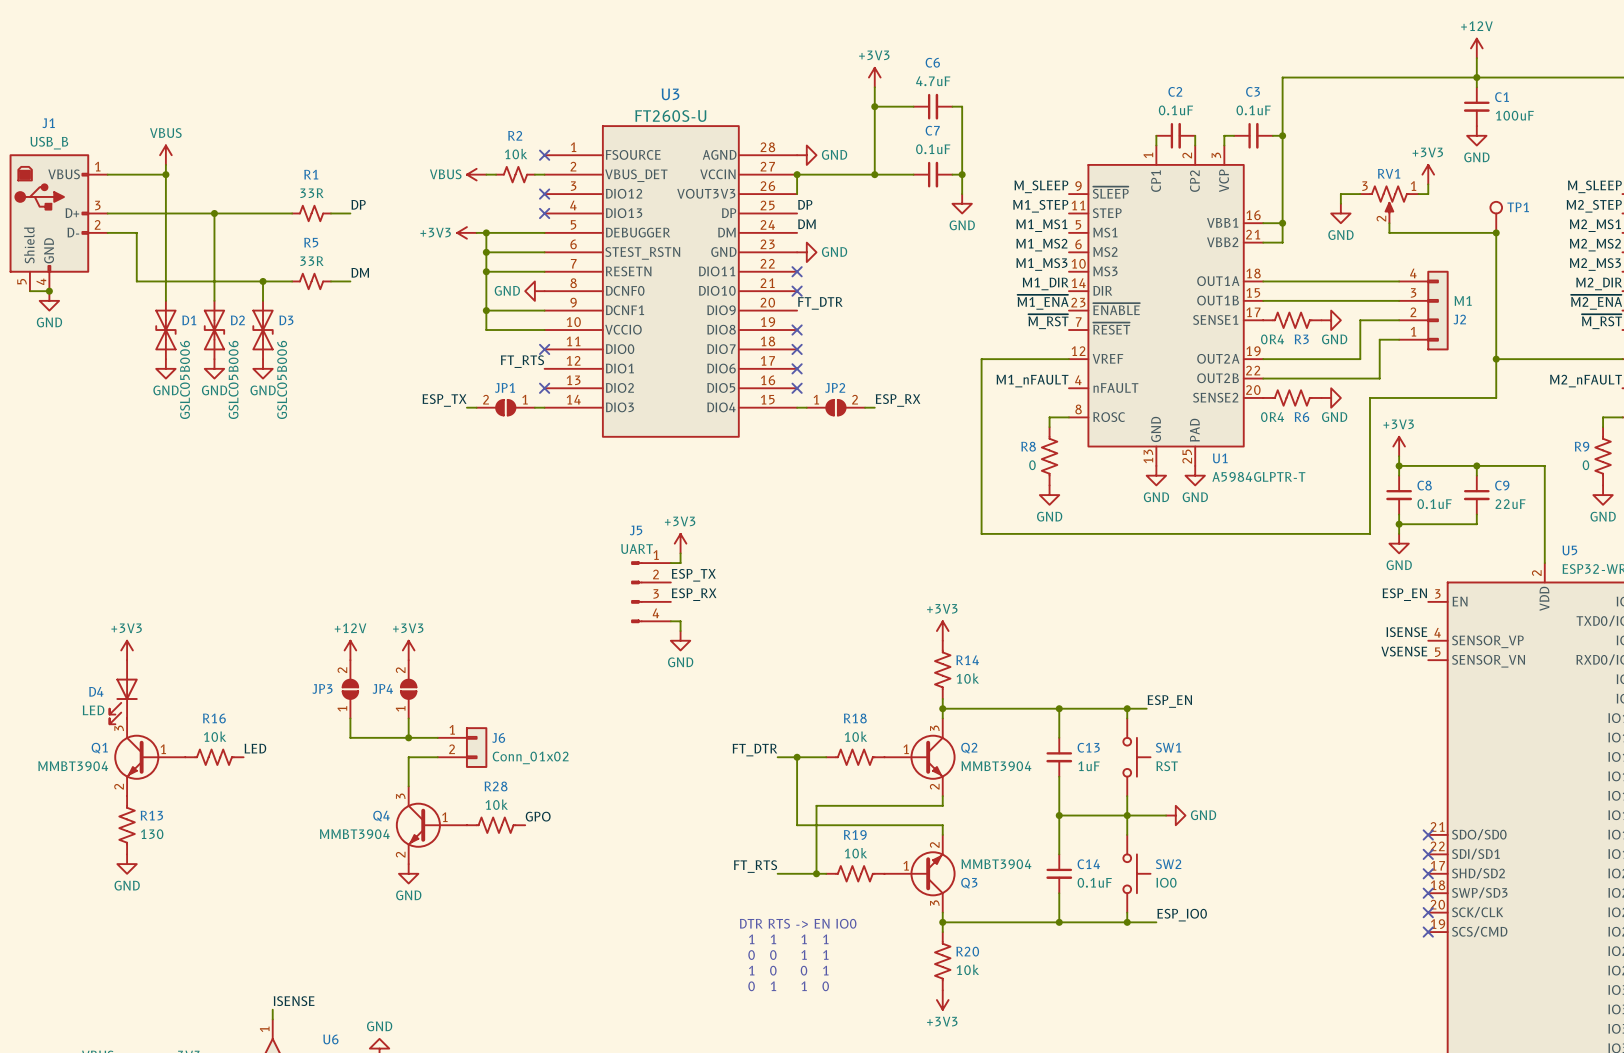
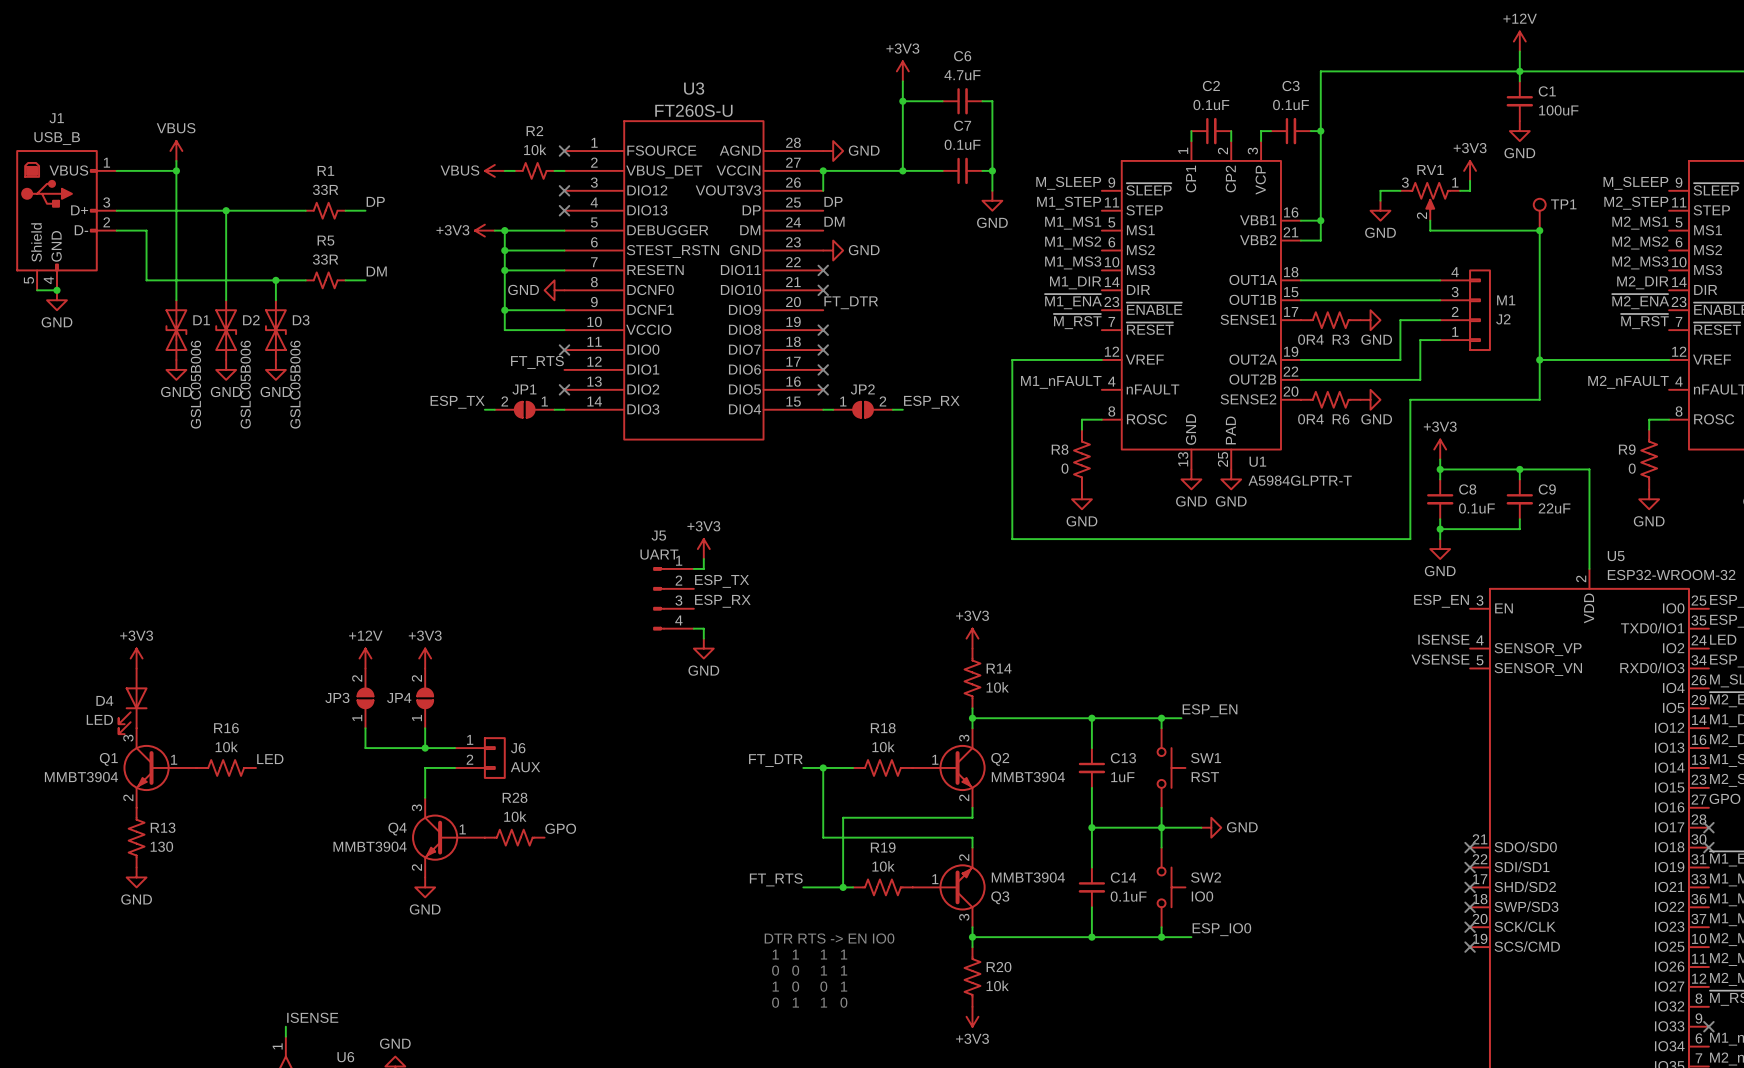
J6 value: Conn_01x02 (530, 757) -> AUX (525, 767)

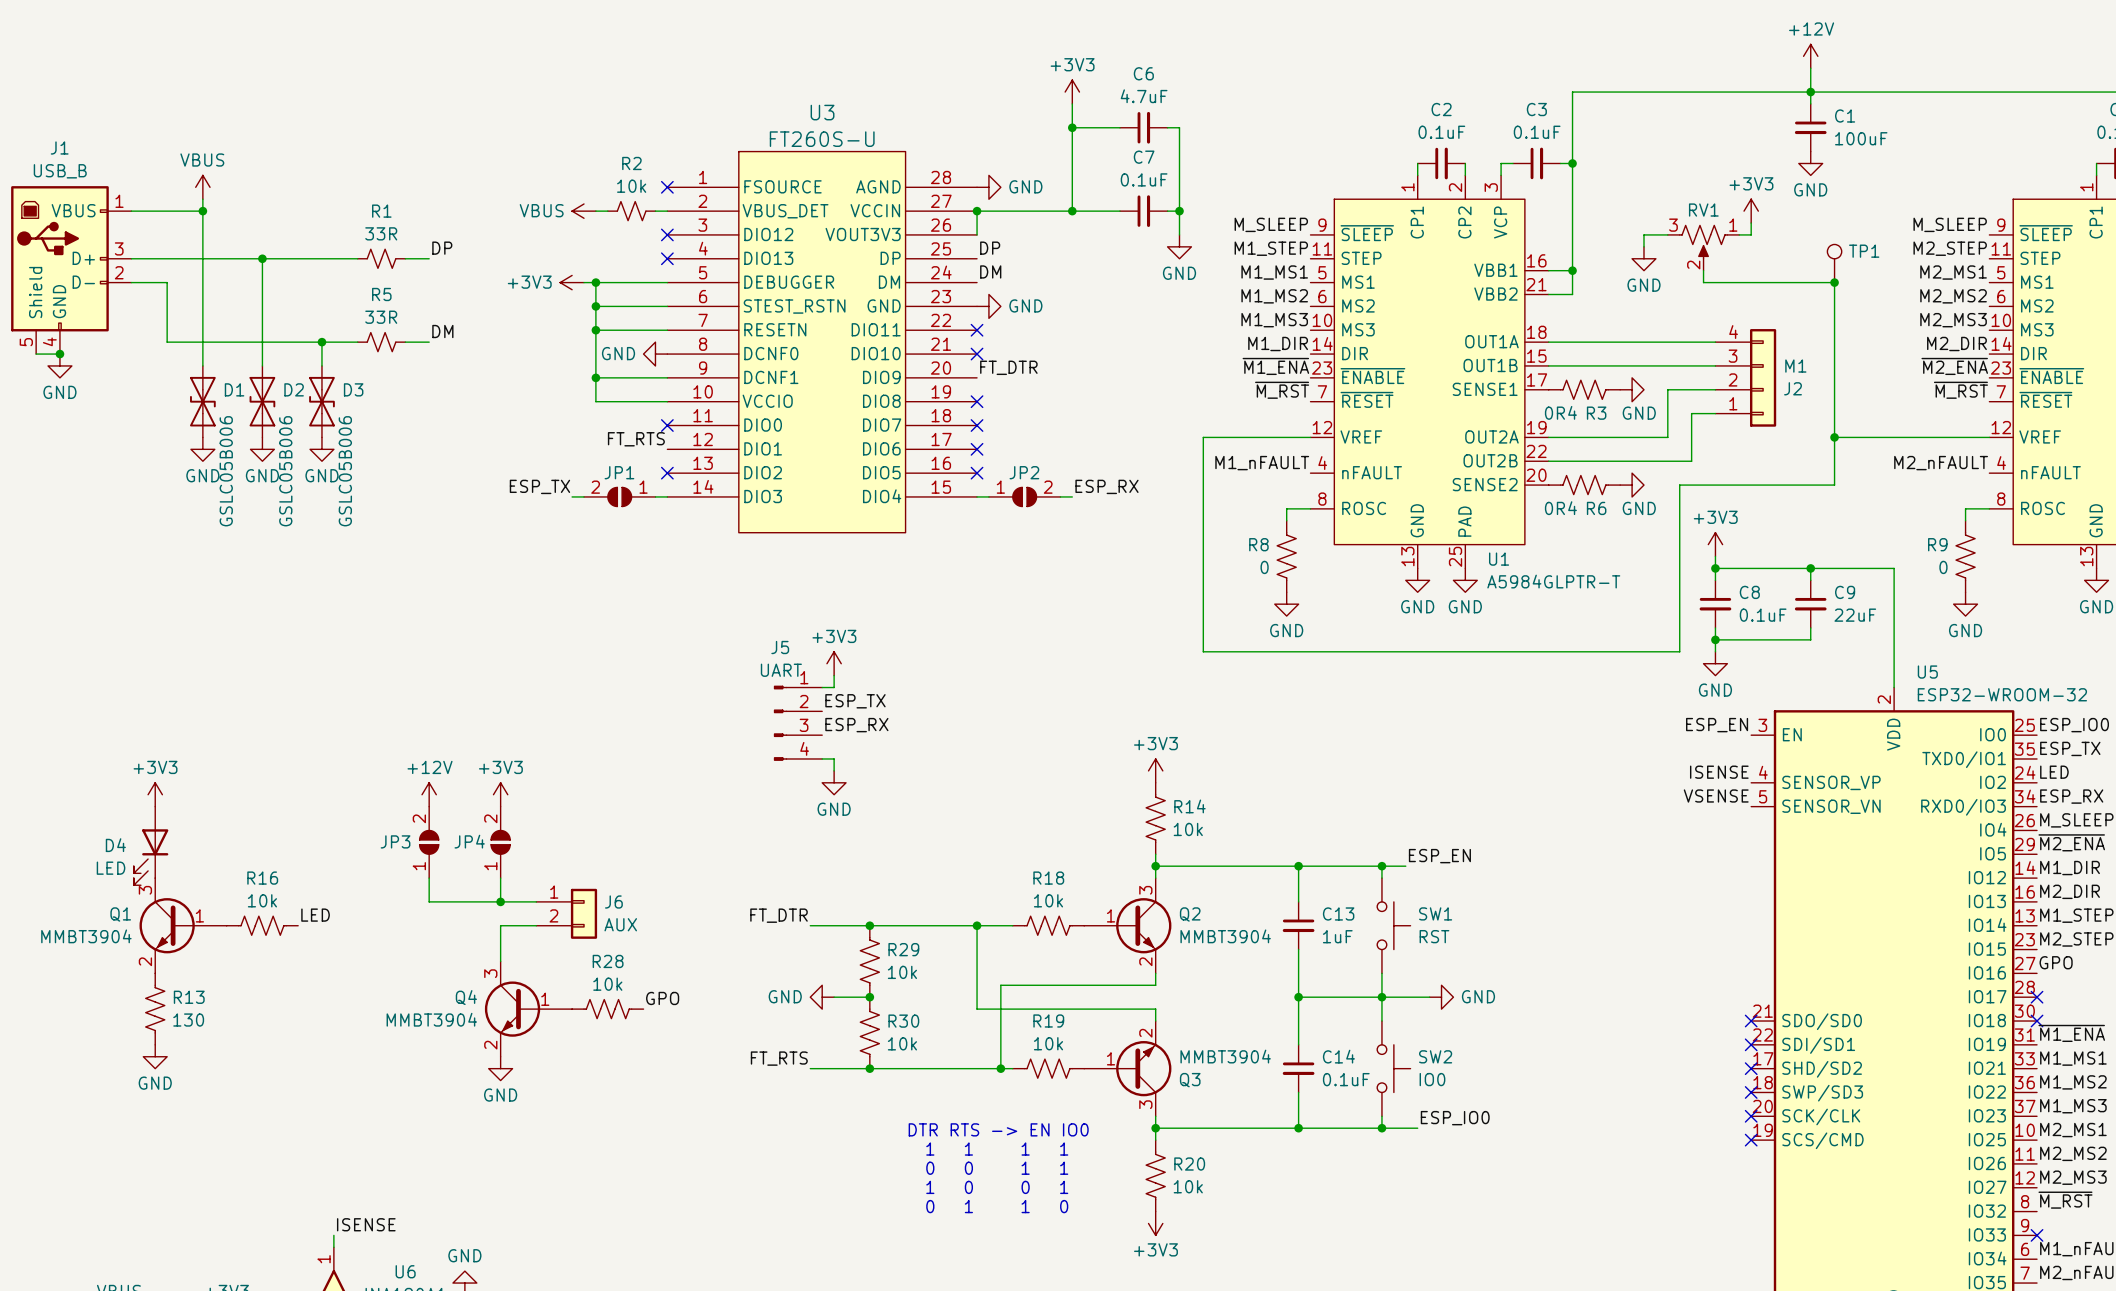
label position: FT_DTR (775, 760) -> FT_DTR (779, 915)
wire: none -> (810, 925) (953, 925)
junction: none -> (869, 925)
R29: none -> 10k (869, 961)
power symbol: none -> GND (822, 997)
wire: none -> (834, 997) (869, 997)
junction: none -> (869, 997)
R30: none -> 10k (869, 1032)
label position: FT_RTS (776, 879) -> FT_RTS (779, 1058)
wire: none -> (810, 1068) (953, 1068)
junction: none -> (869, 1068)

